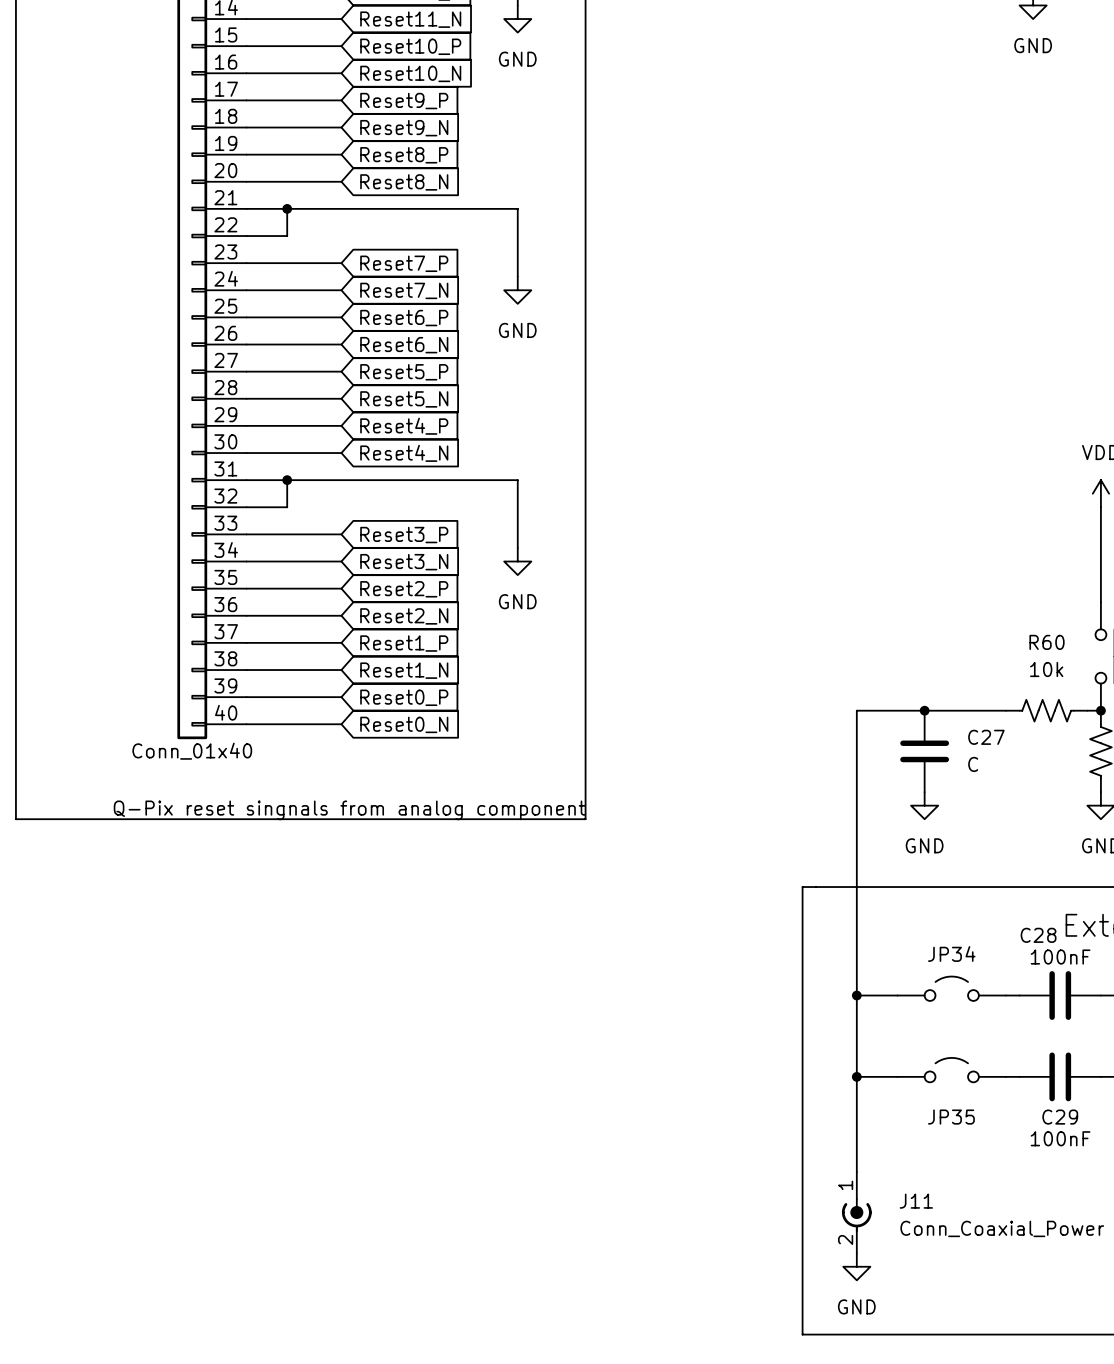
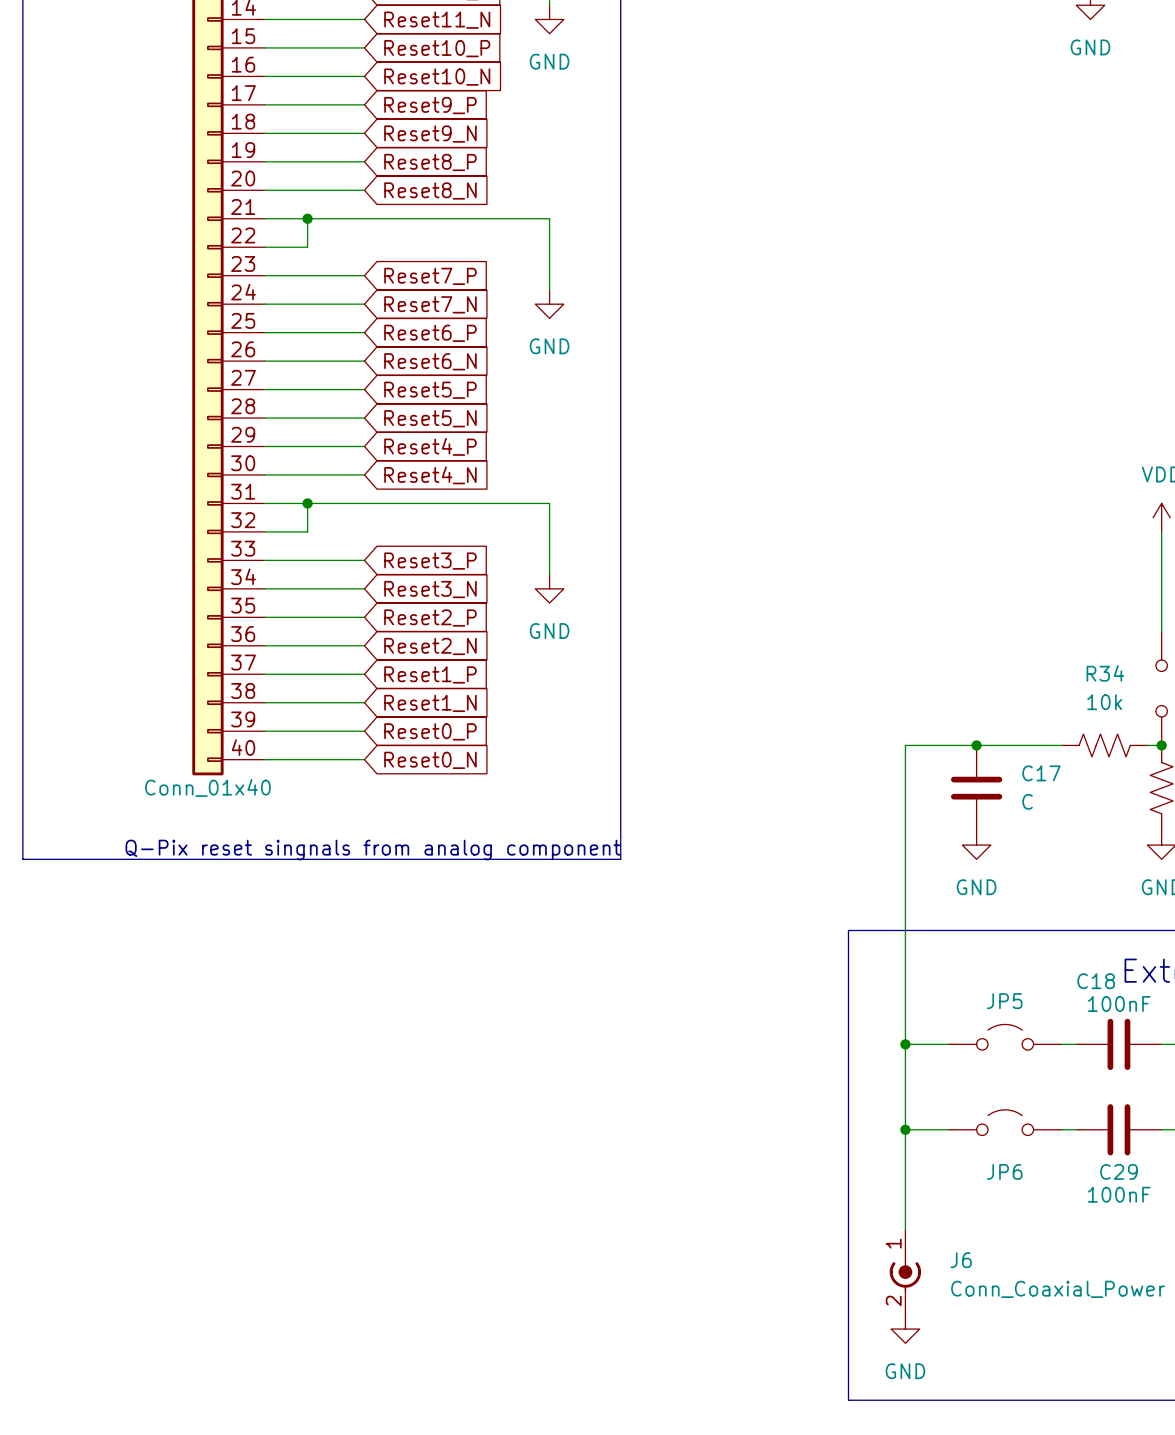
R60 name: R60 (1047, 642) -> R34 (1105, 673)
C27 name: C27 (986, 737) -> C17 (1041, 773)
C28 name: C28 (1038, 935) -> C18 (1096, 981)
JP34 name: JP34 (951, 953) -> JP5 (1004, 1001)
JP35 name: JP35 (951, 1117) -> JP6 (1004, 1171)
J11 name: J11 (916, 1201) -> J6 (961, 1260)

